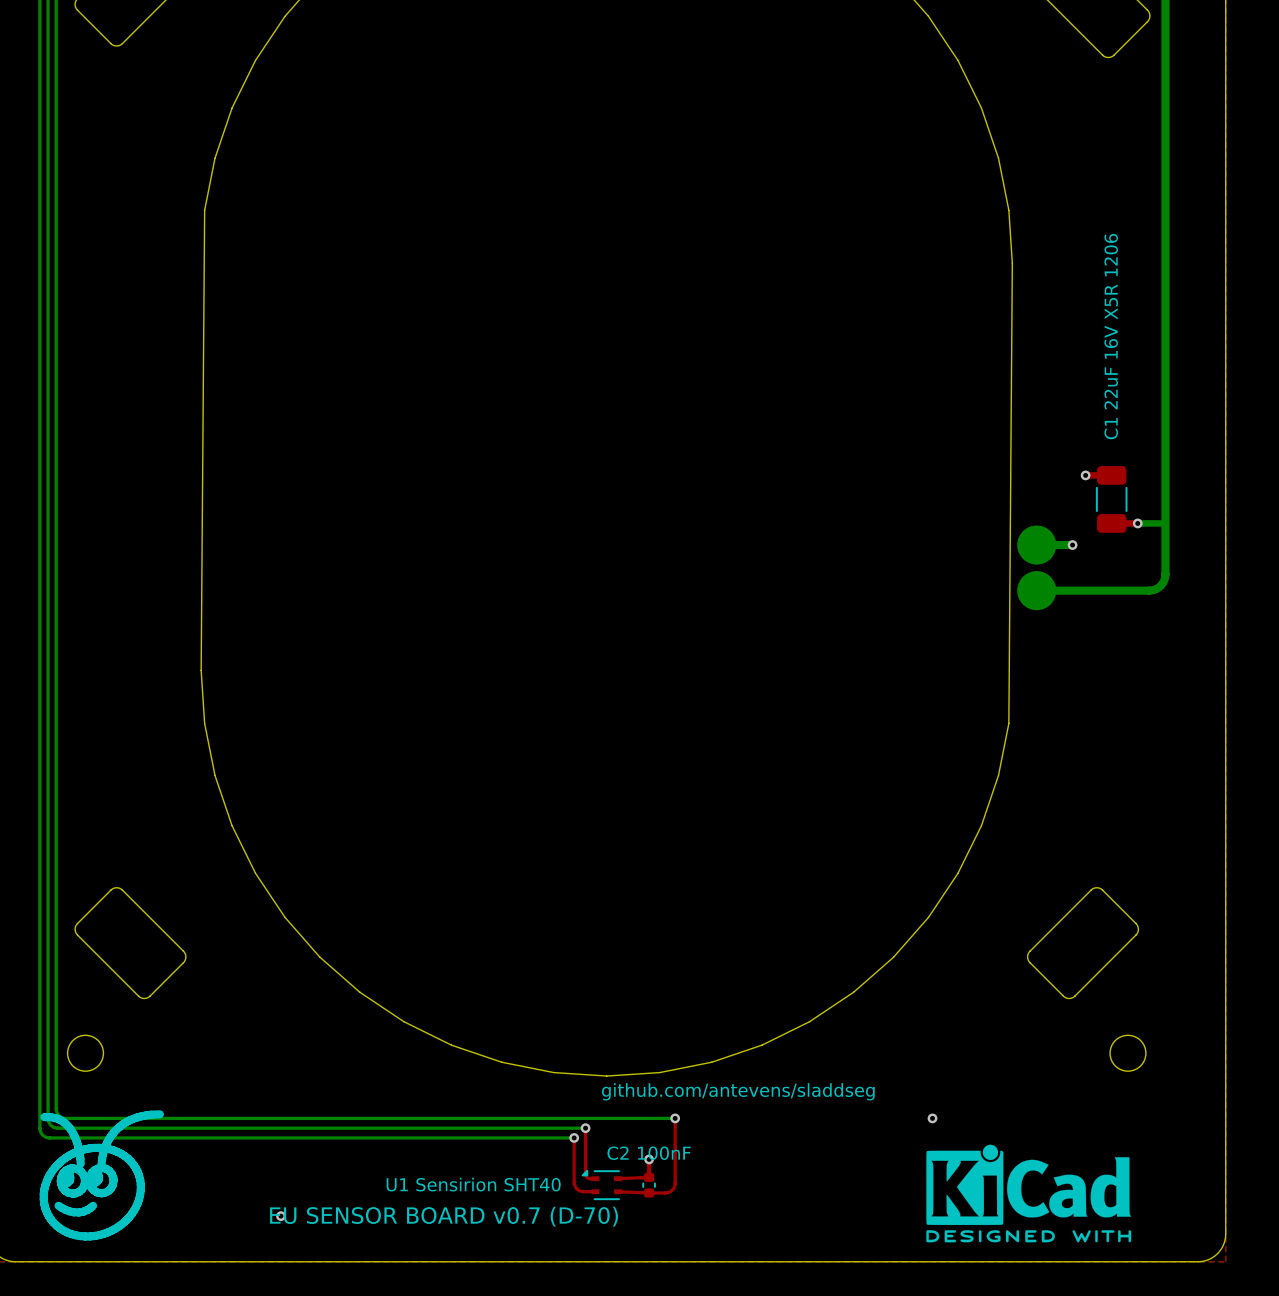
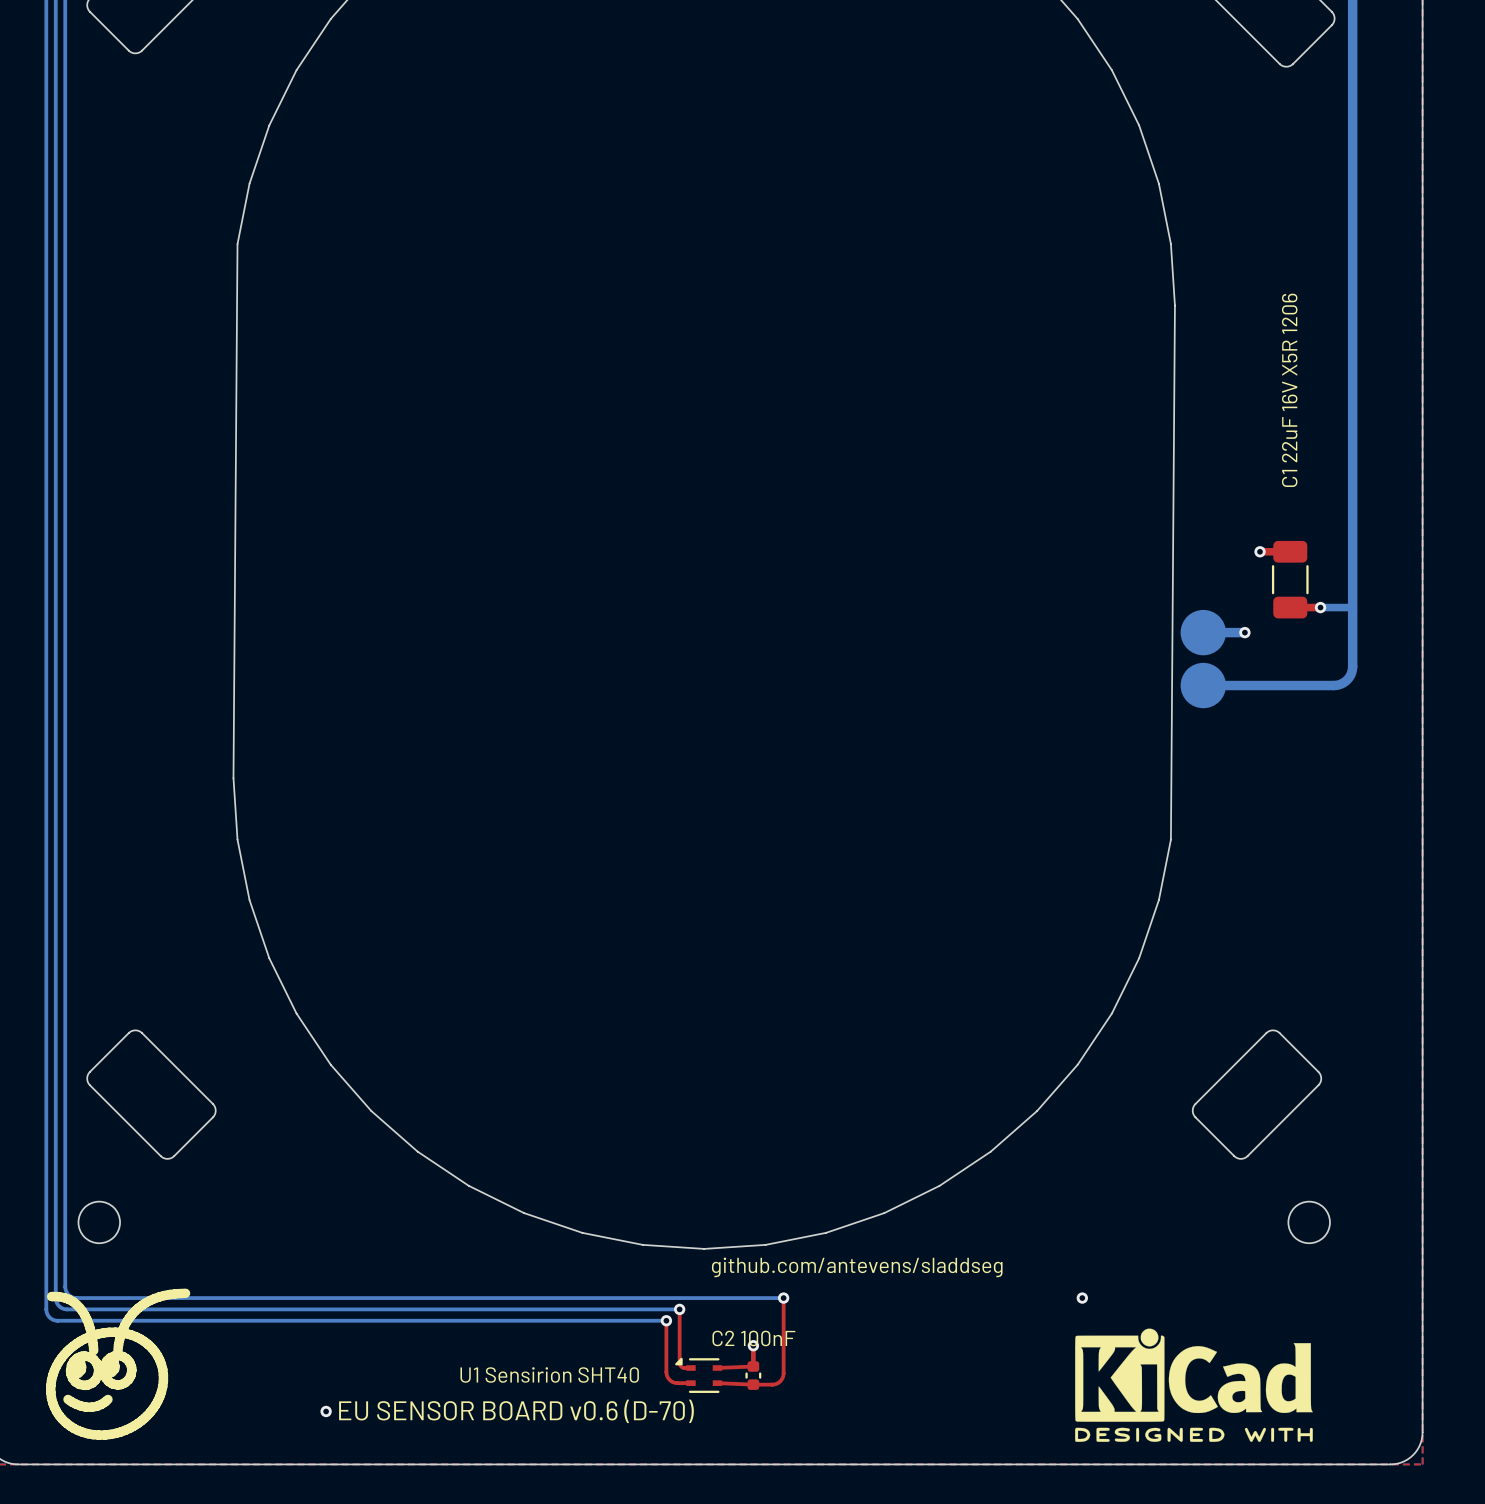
text: EU SENSOR BOARD v0.7 (D-70) (444, 1216) -> EU SENSOR BOARD v0.6 (D-70) (516, 1411)

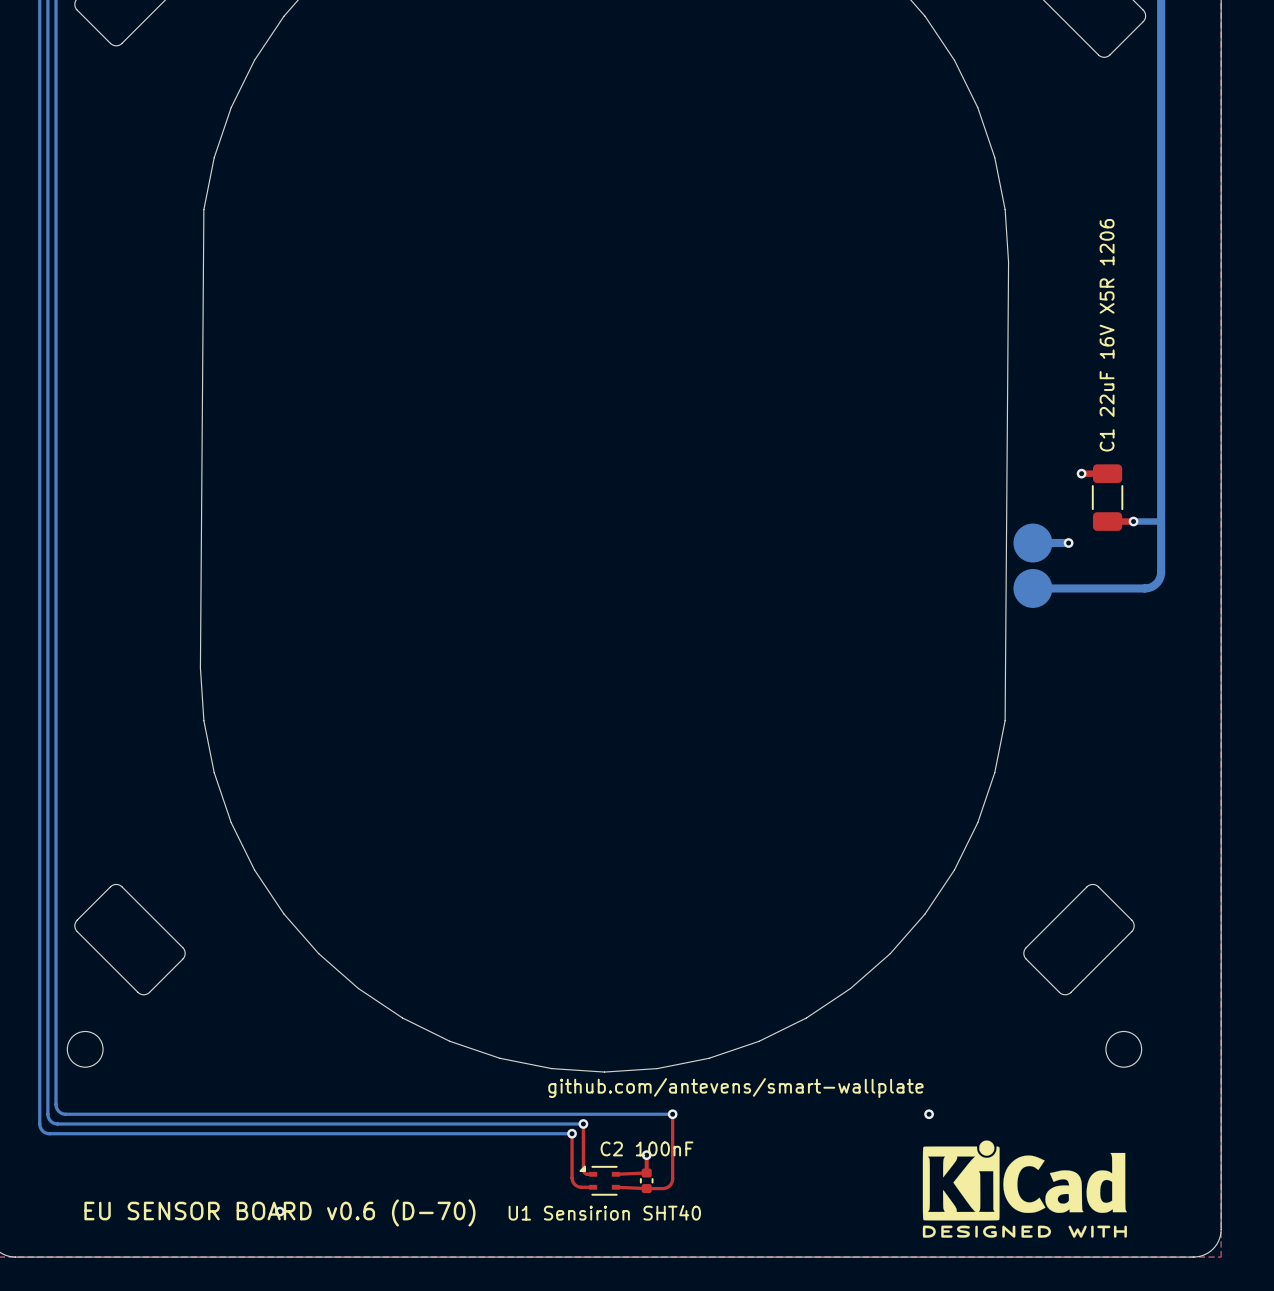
text: github.com/antevens/sladdseg (857, 1267) -> github.com/antevens/smart-wallplate (735, 1088)
drawing: [46, 1288, 191, 1440] -> none
text position: U1 Sensirion SHT40 (549, 1375) -> U1 Sensirion SHT40 (604, 1212)
text position: EU SENSOR BOARD v0.6 (D-70) (516, 1411) -> EU SENSOR BOARD v0.6 (D-70) (279, 1212)

